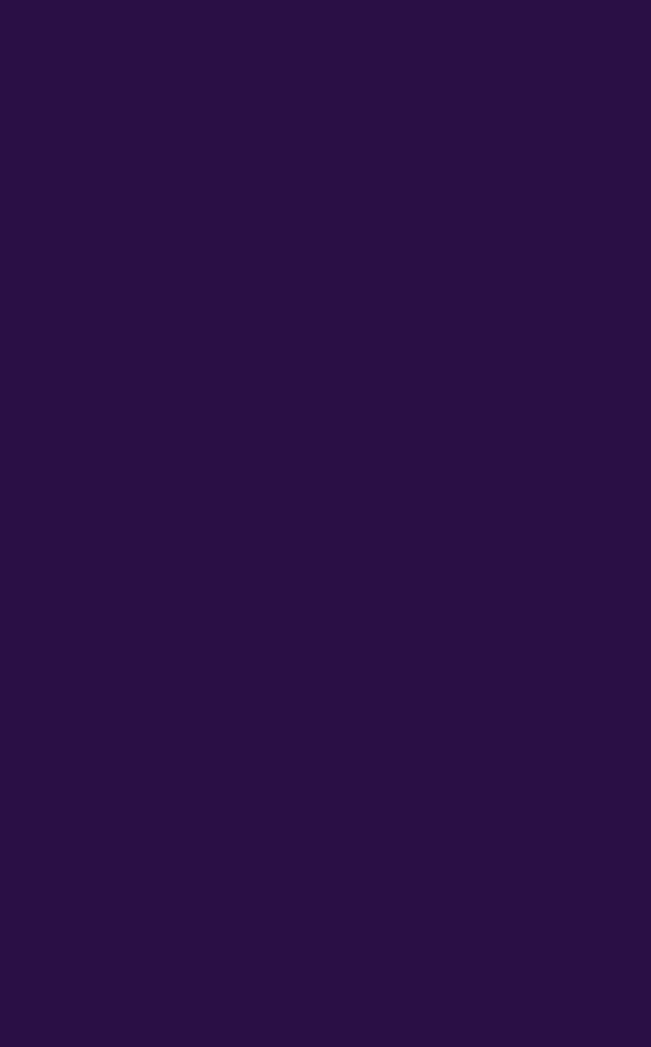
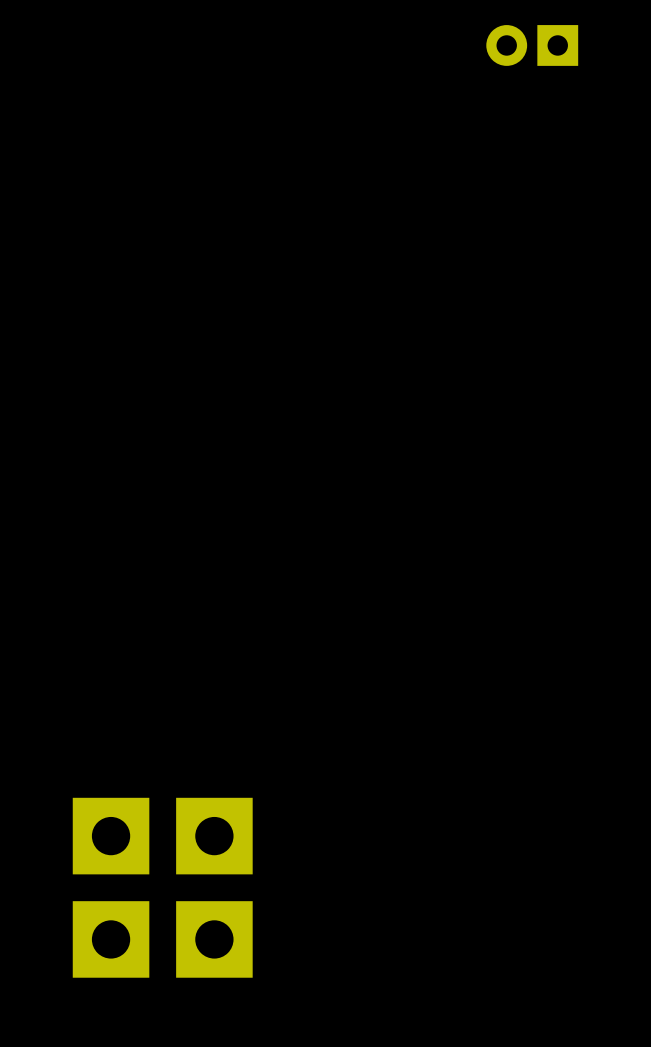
part: none -> (532, 45)
part: none -> (111, 836)
part: none -> (214, 836)
part: none -> (111, 939)
part: none -> (214, 939)

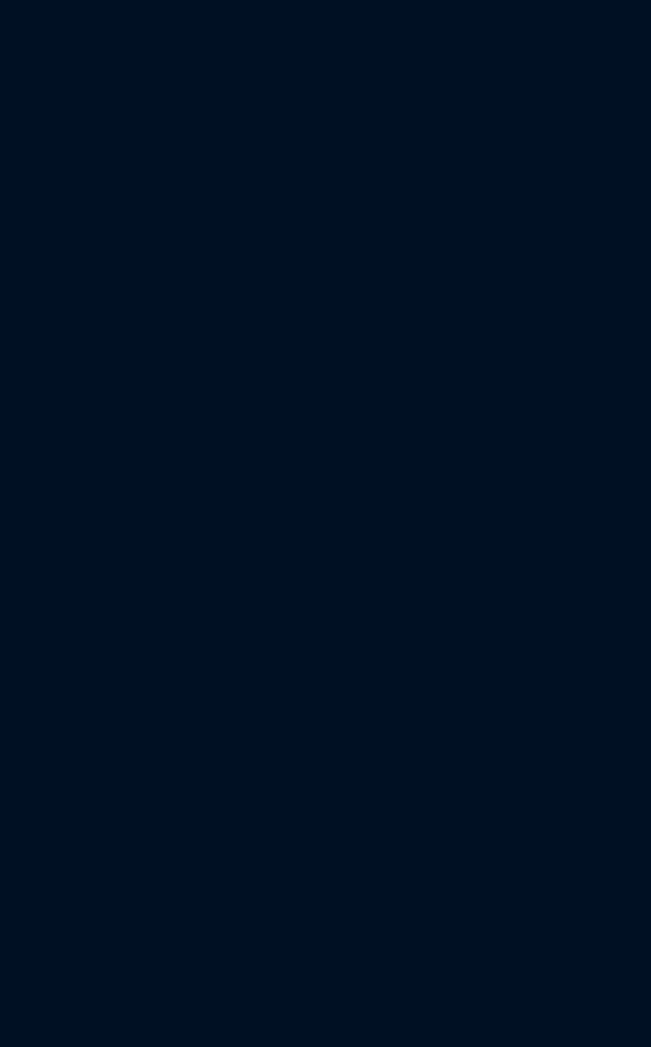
part: (532, 45) -> none
part: (111, 836) -> none
part: (214, 836) -> none
part: (111, 939) -> none
part: (214, 939) -> none

